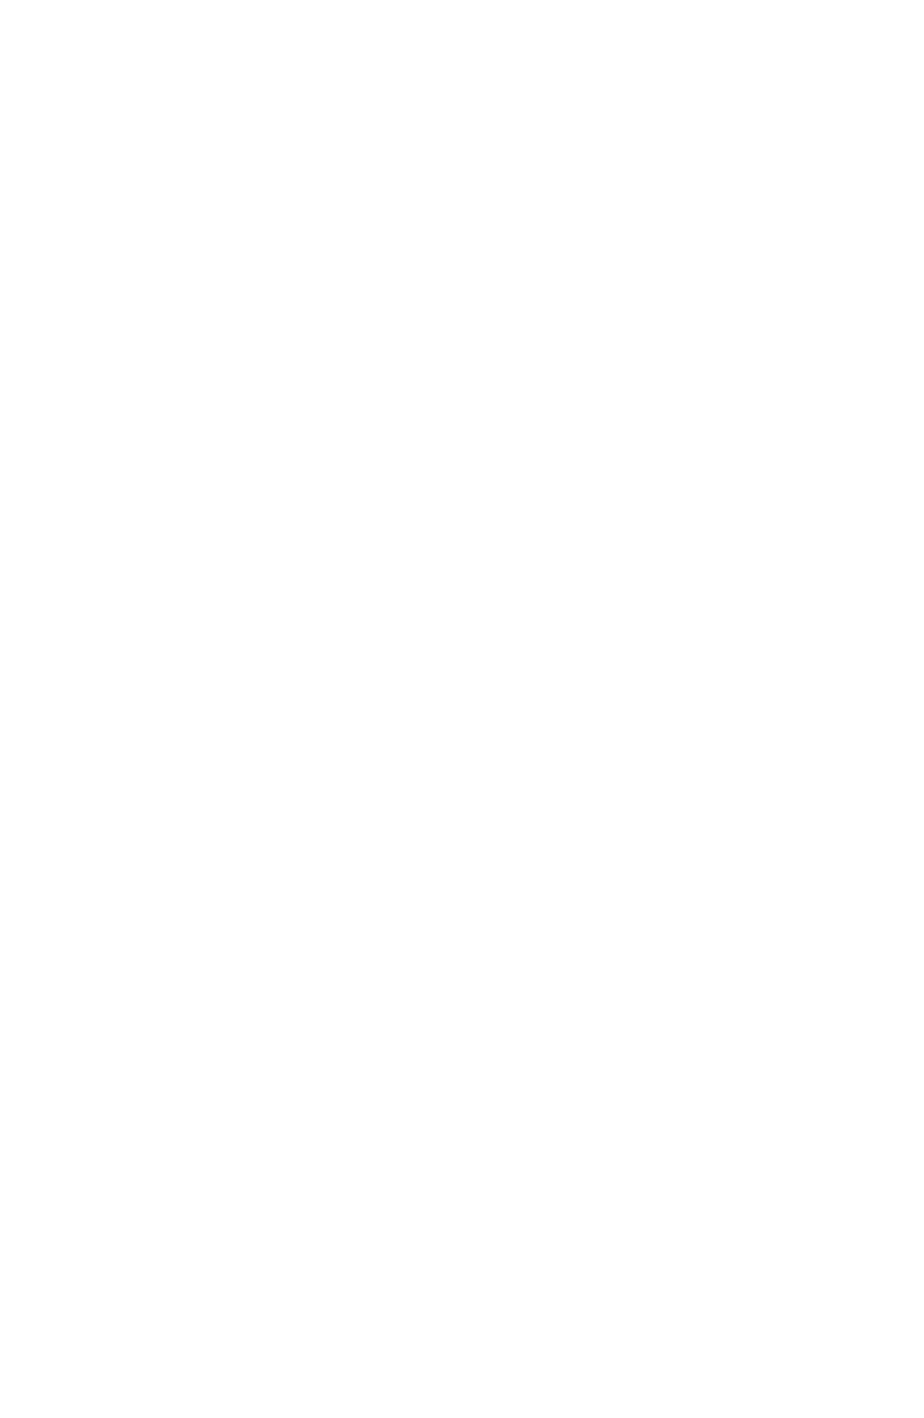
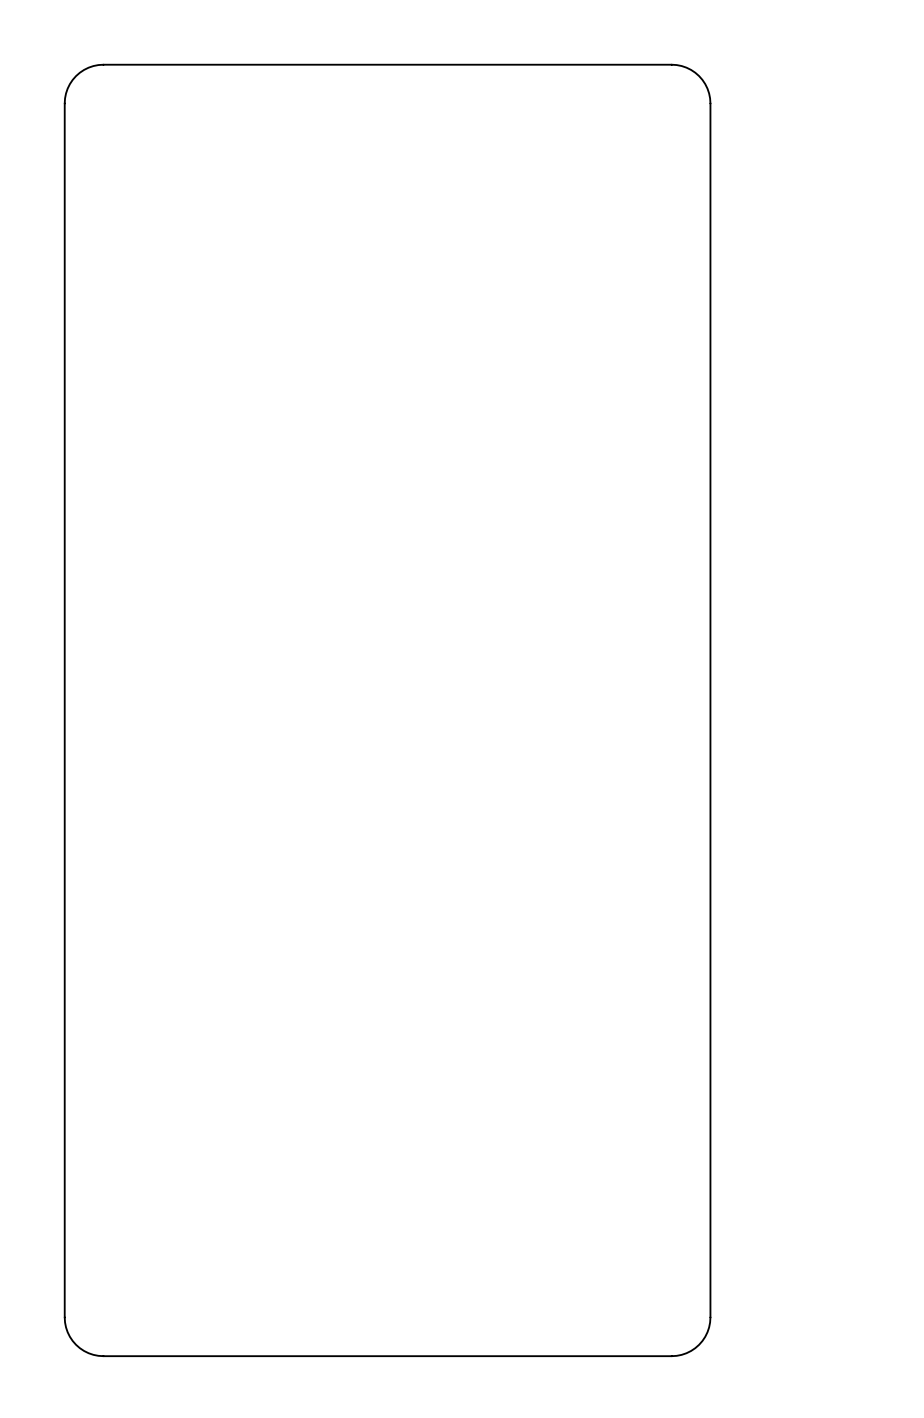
drawing: none -> [64, 64, 711, 1357]

